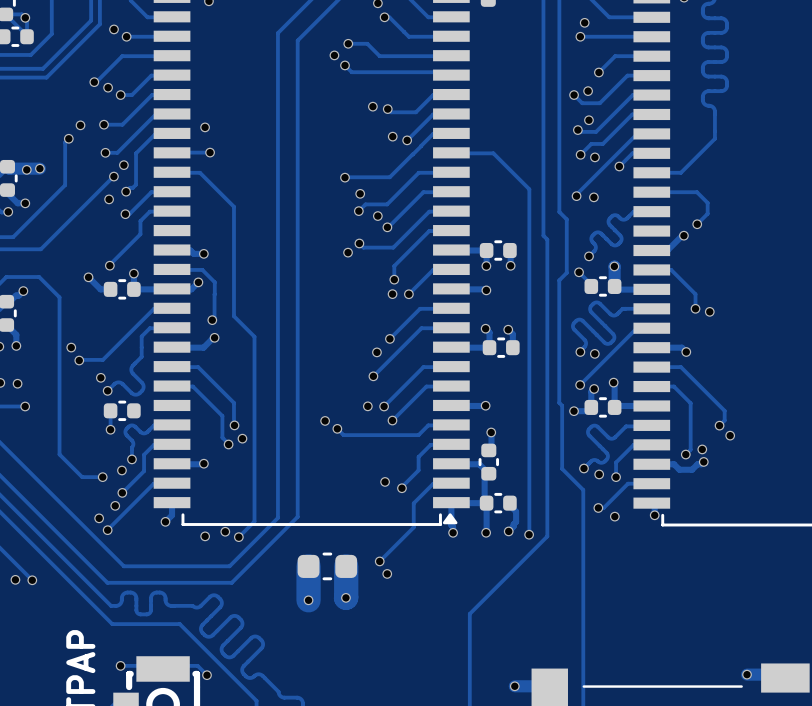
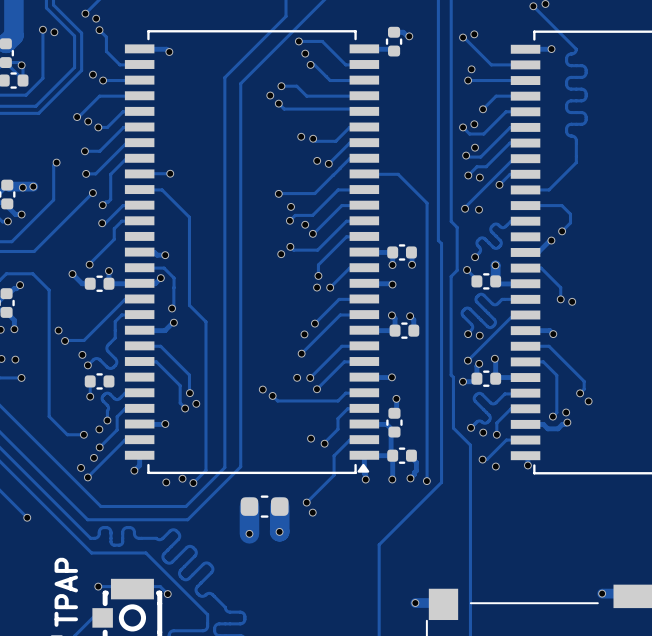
via: (80, 125) -> none
via: (205, 127) -> none
via: (123, 165) -> none
via: (109, 199) -> none
via: (15, 579) -> none

